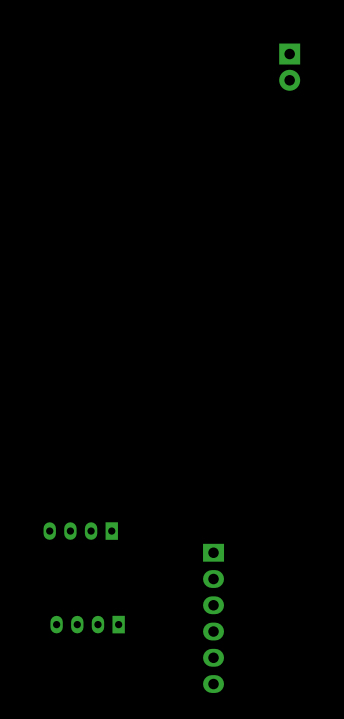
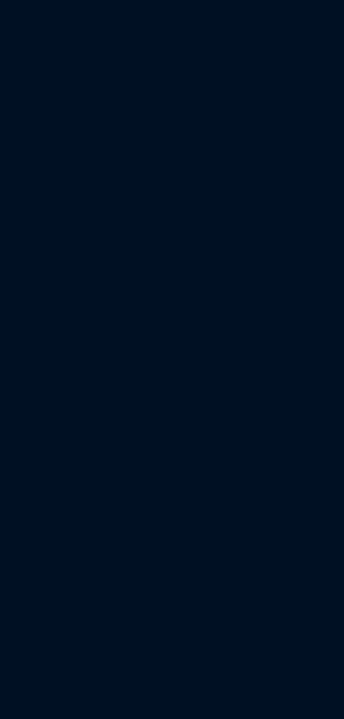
part: (289, 67) -> none
part: (80, 531) -> none
part: (213, 618) -> none
part: (87, 624) -> none

